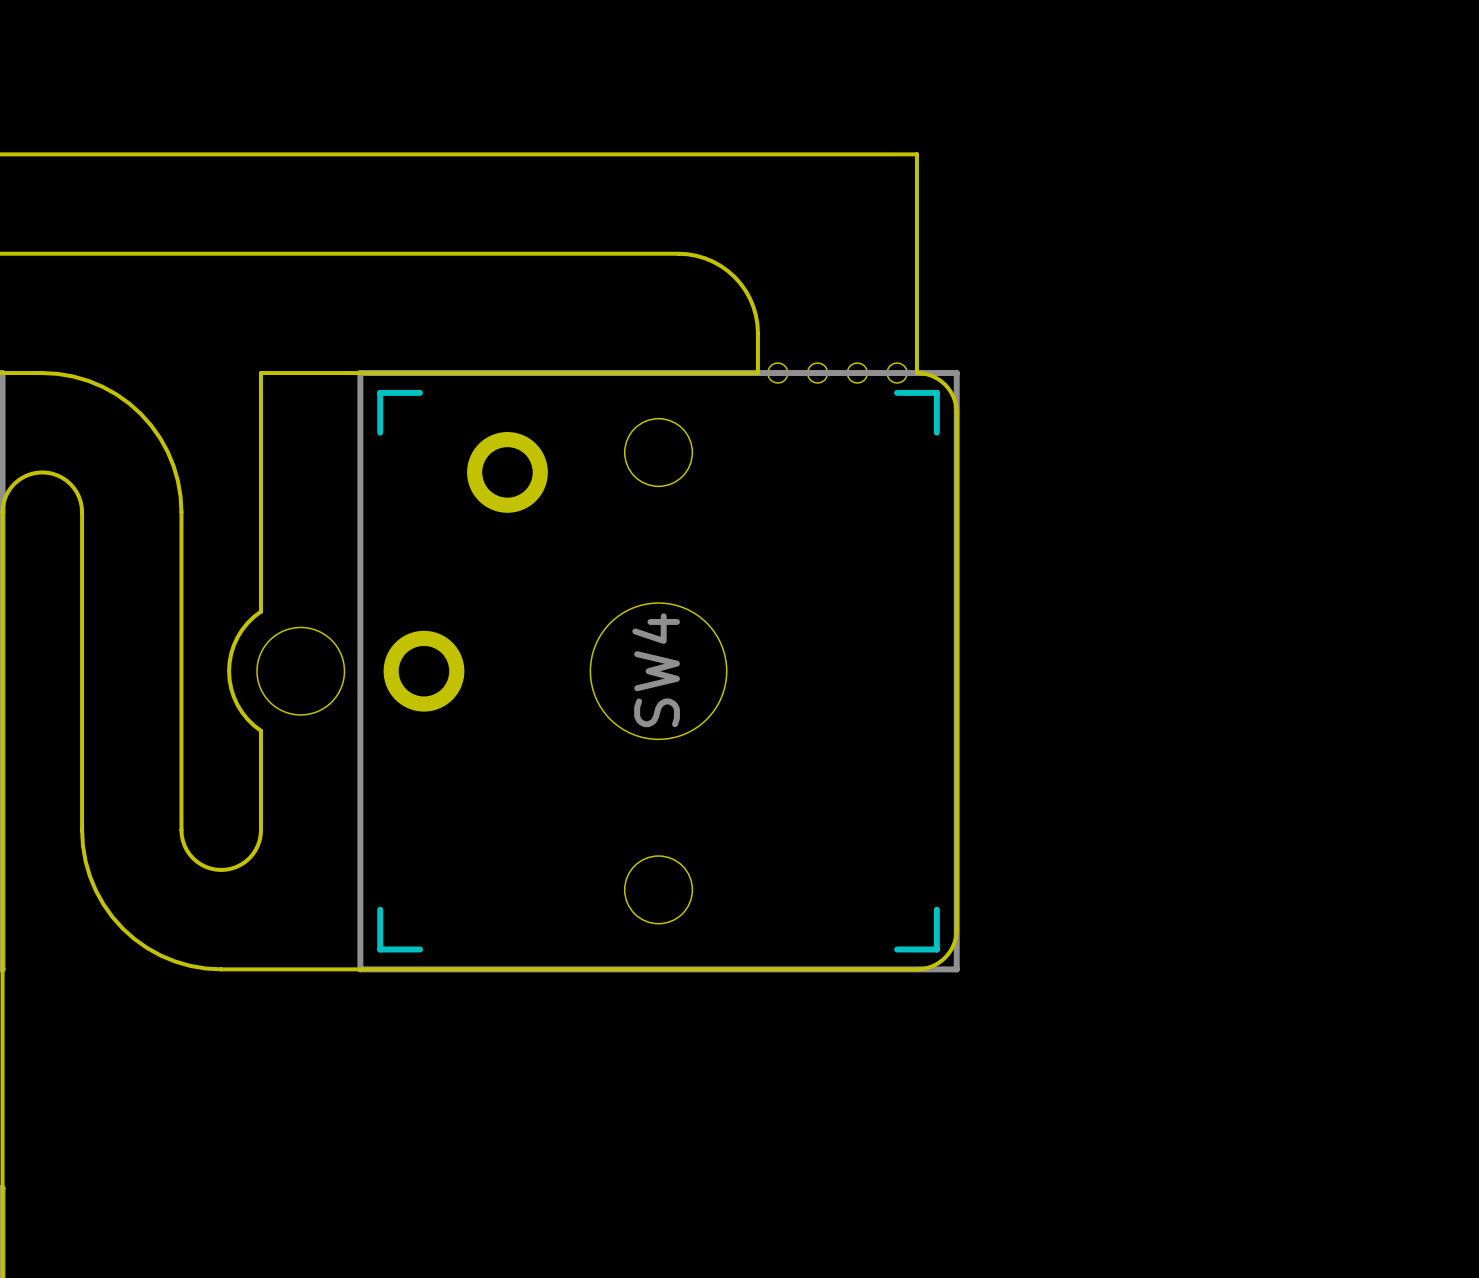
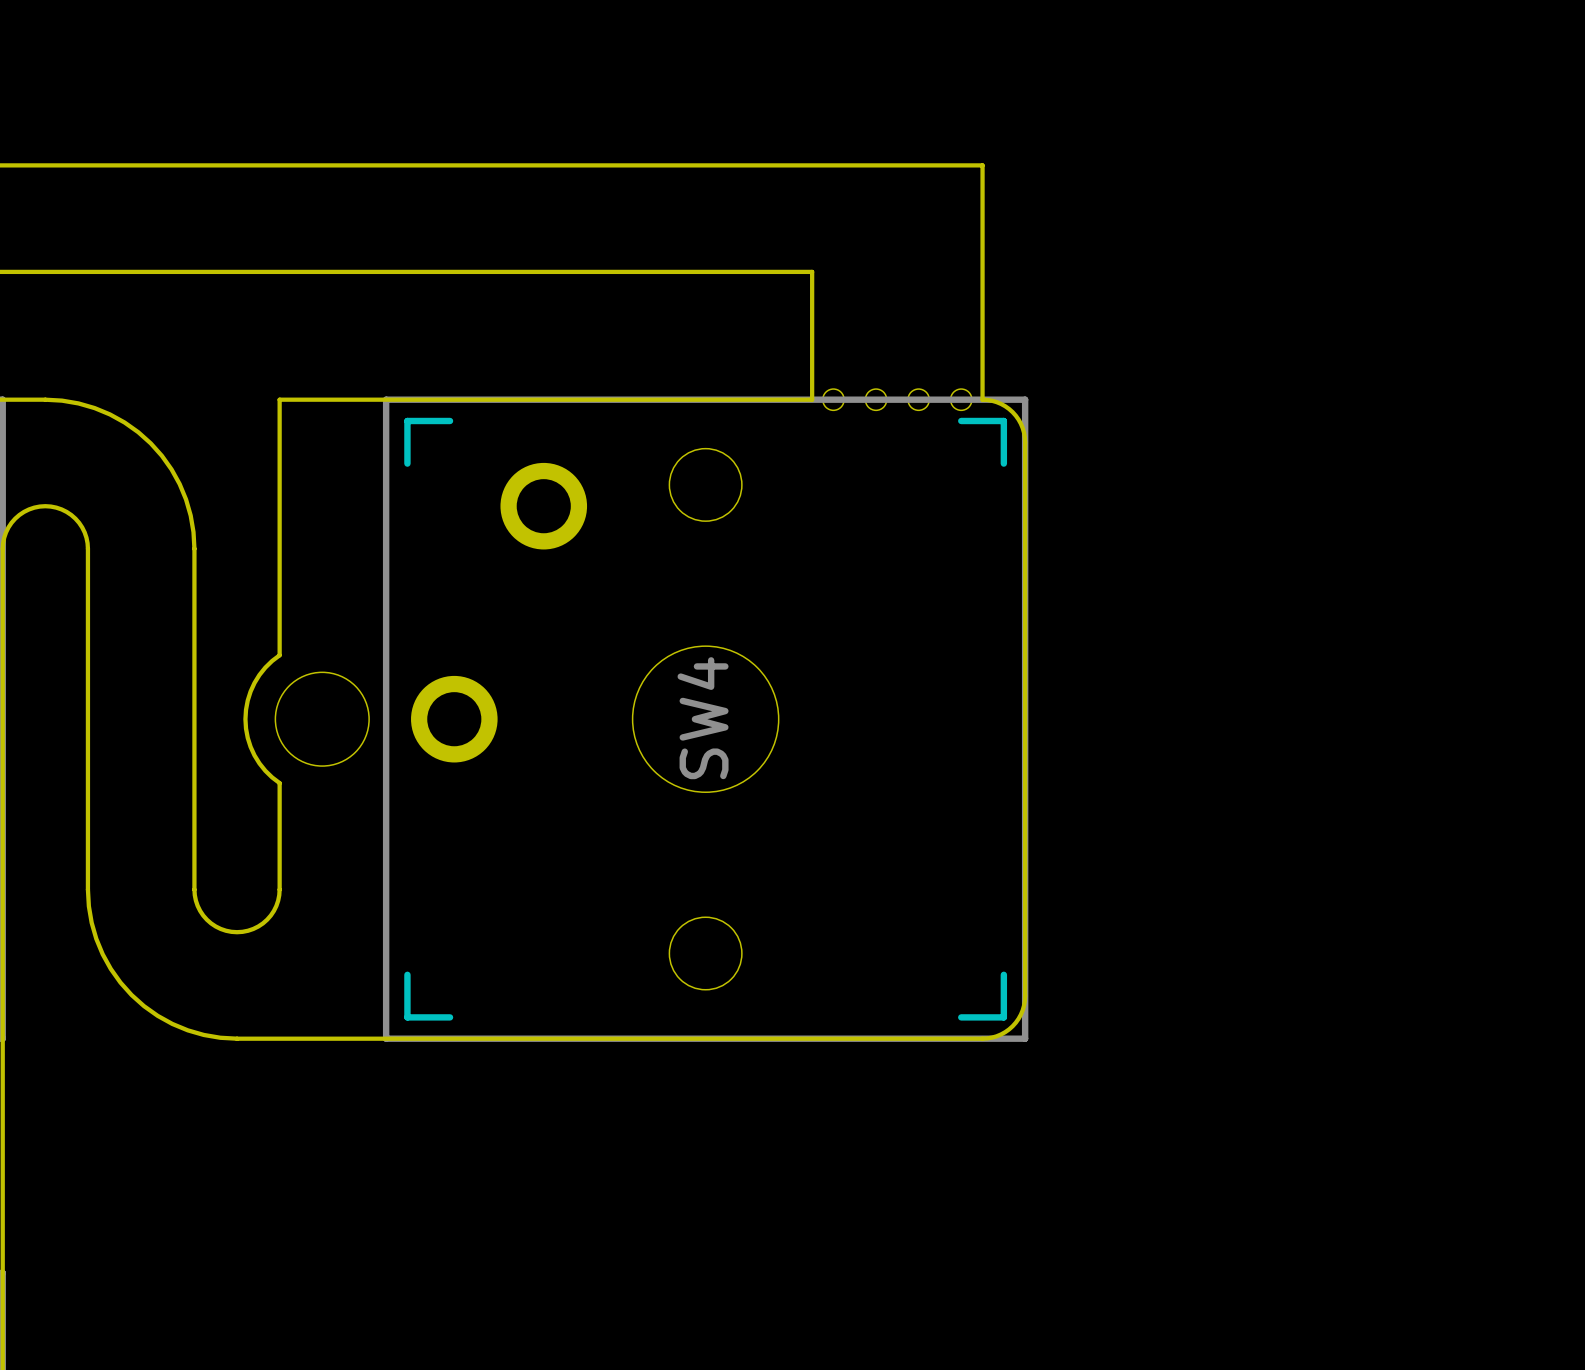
board edge: (678, 253) (704, 258) (720, 265) (734, 277) (745, 290) (753, 306) (757, 333) -> (726, 271) (812, 271) (812, 357)

